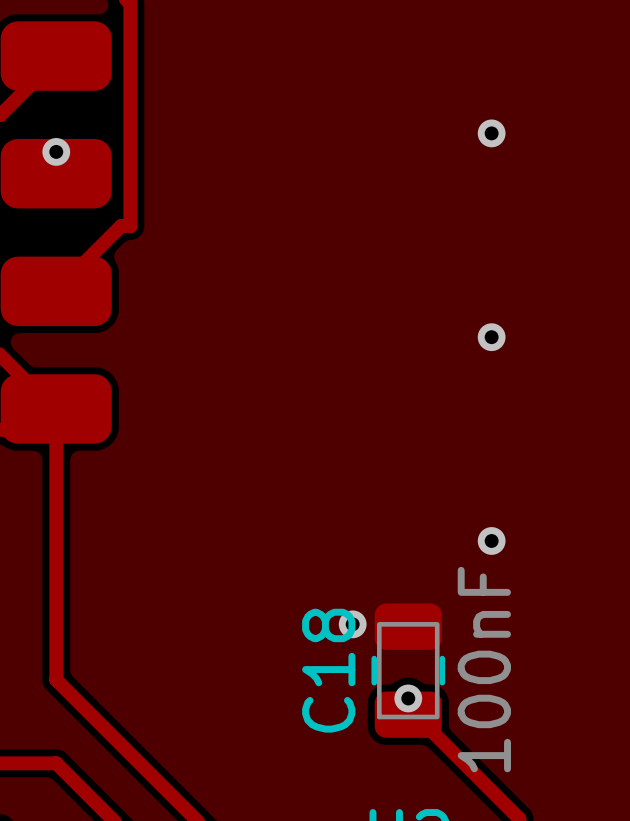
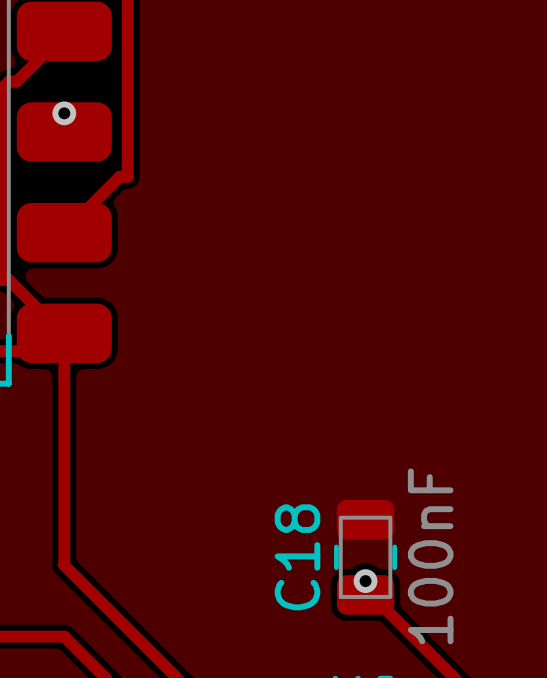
via: (491, 133) -> none
via: (491, 337) -> none
via: (491, 540) -> none
via: (352, 624) -> none

